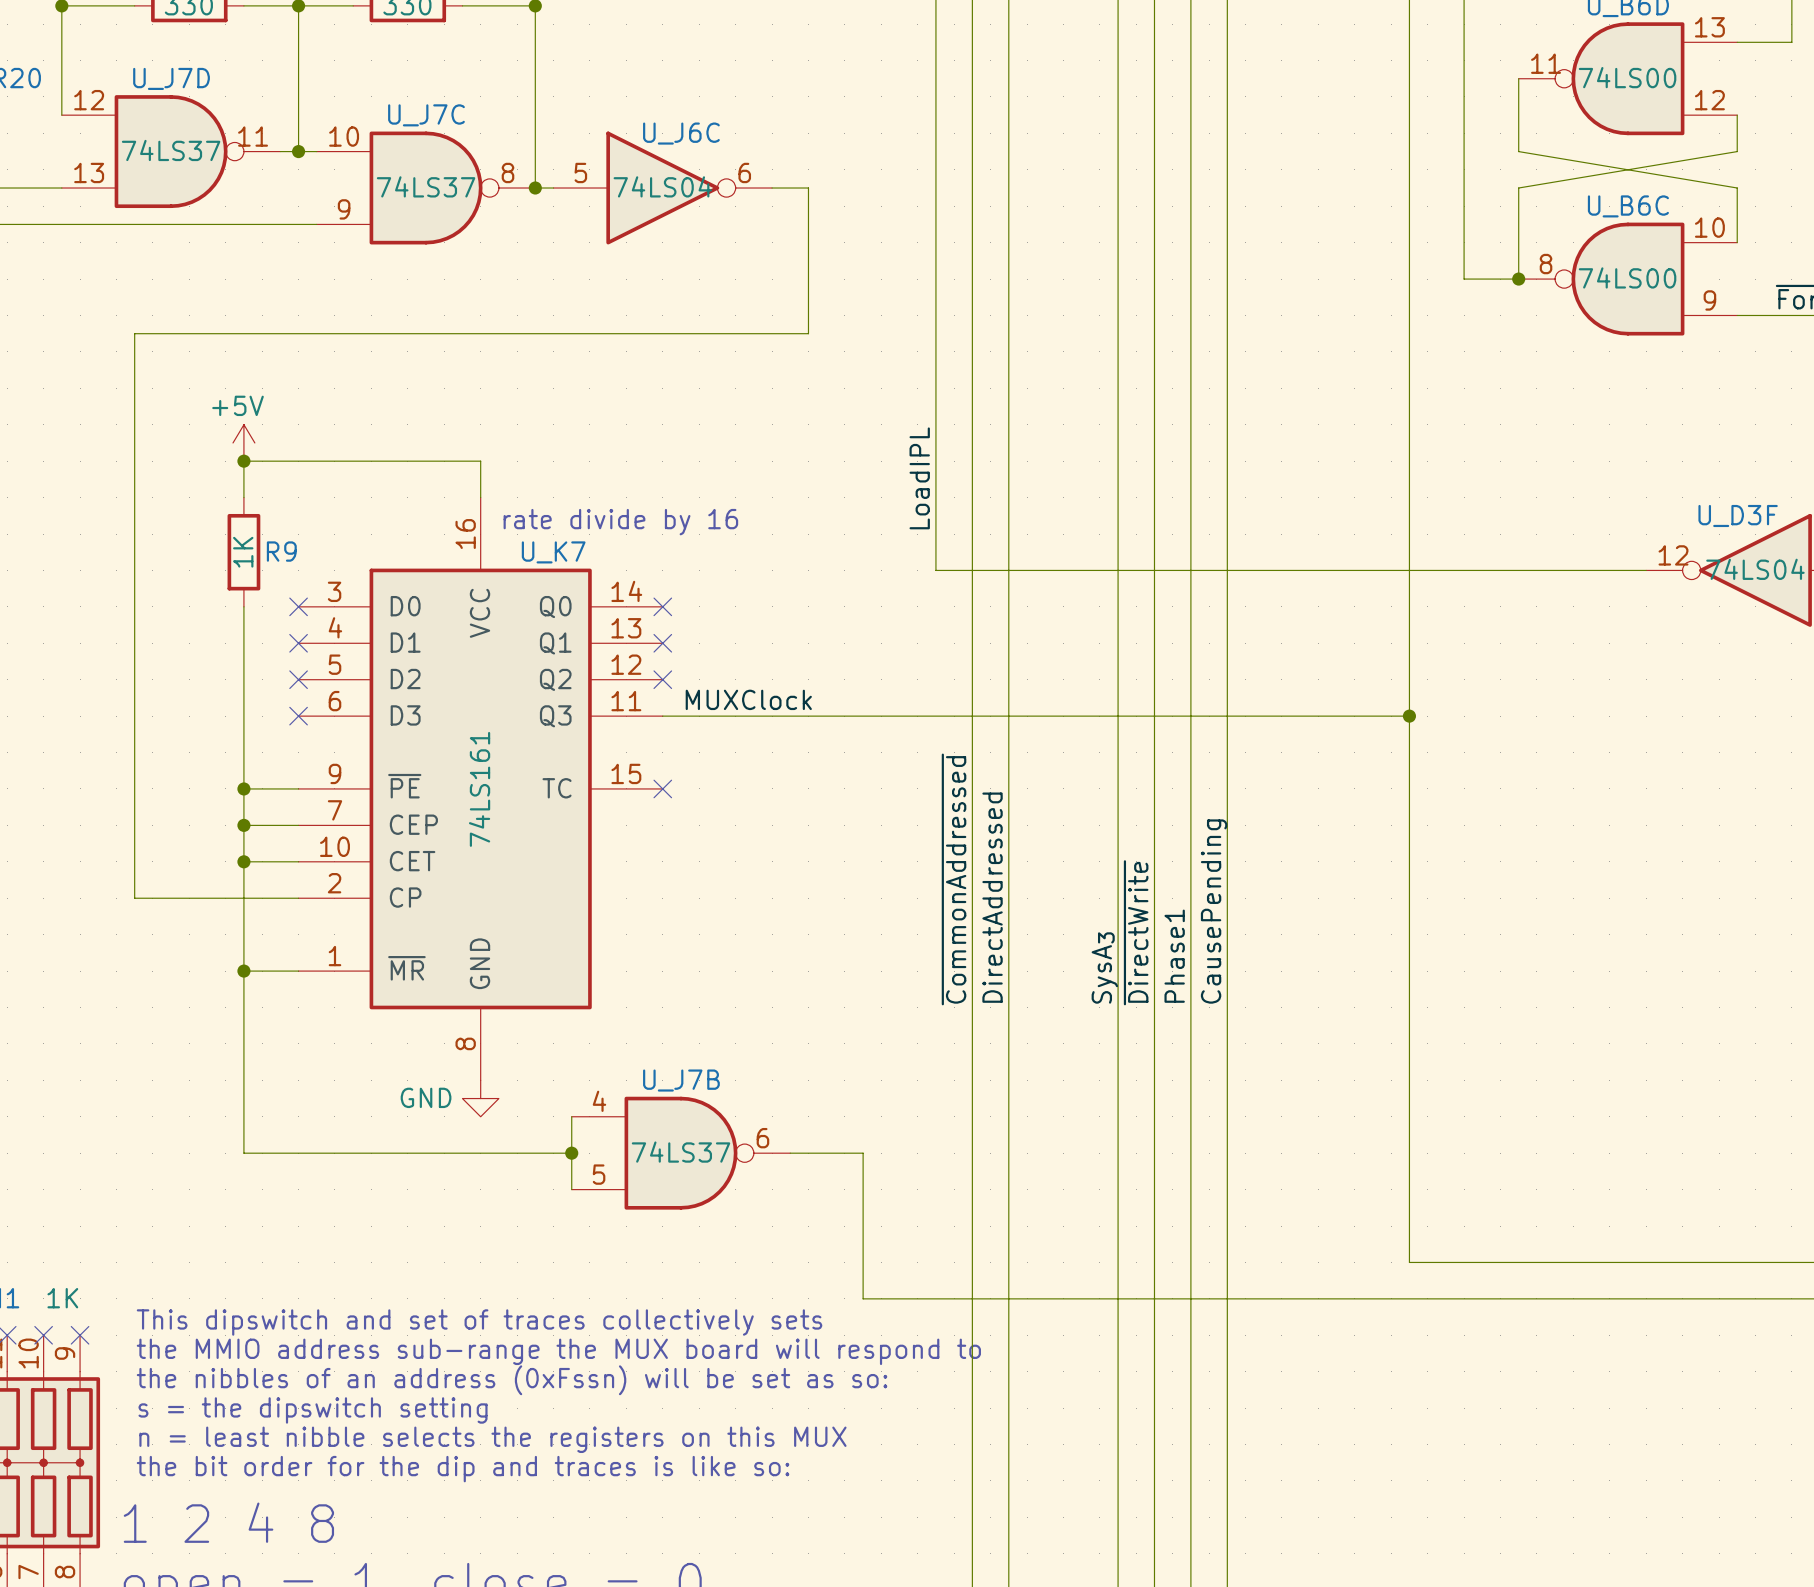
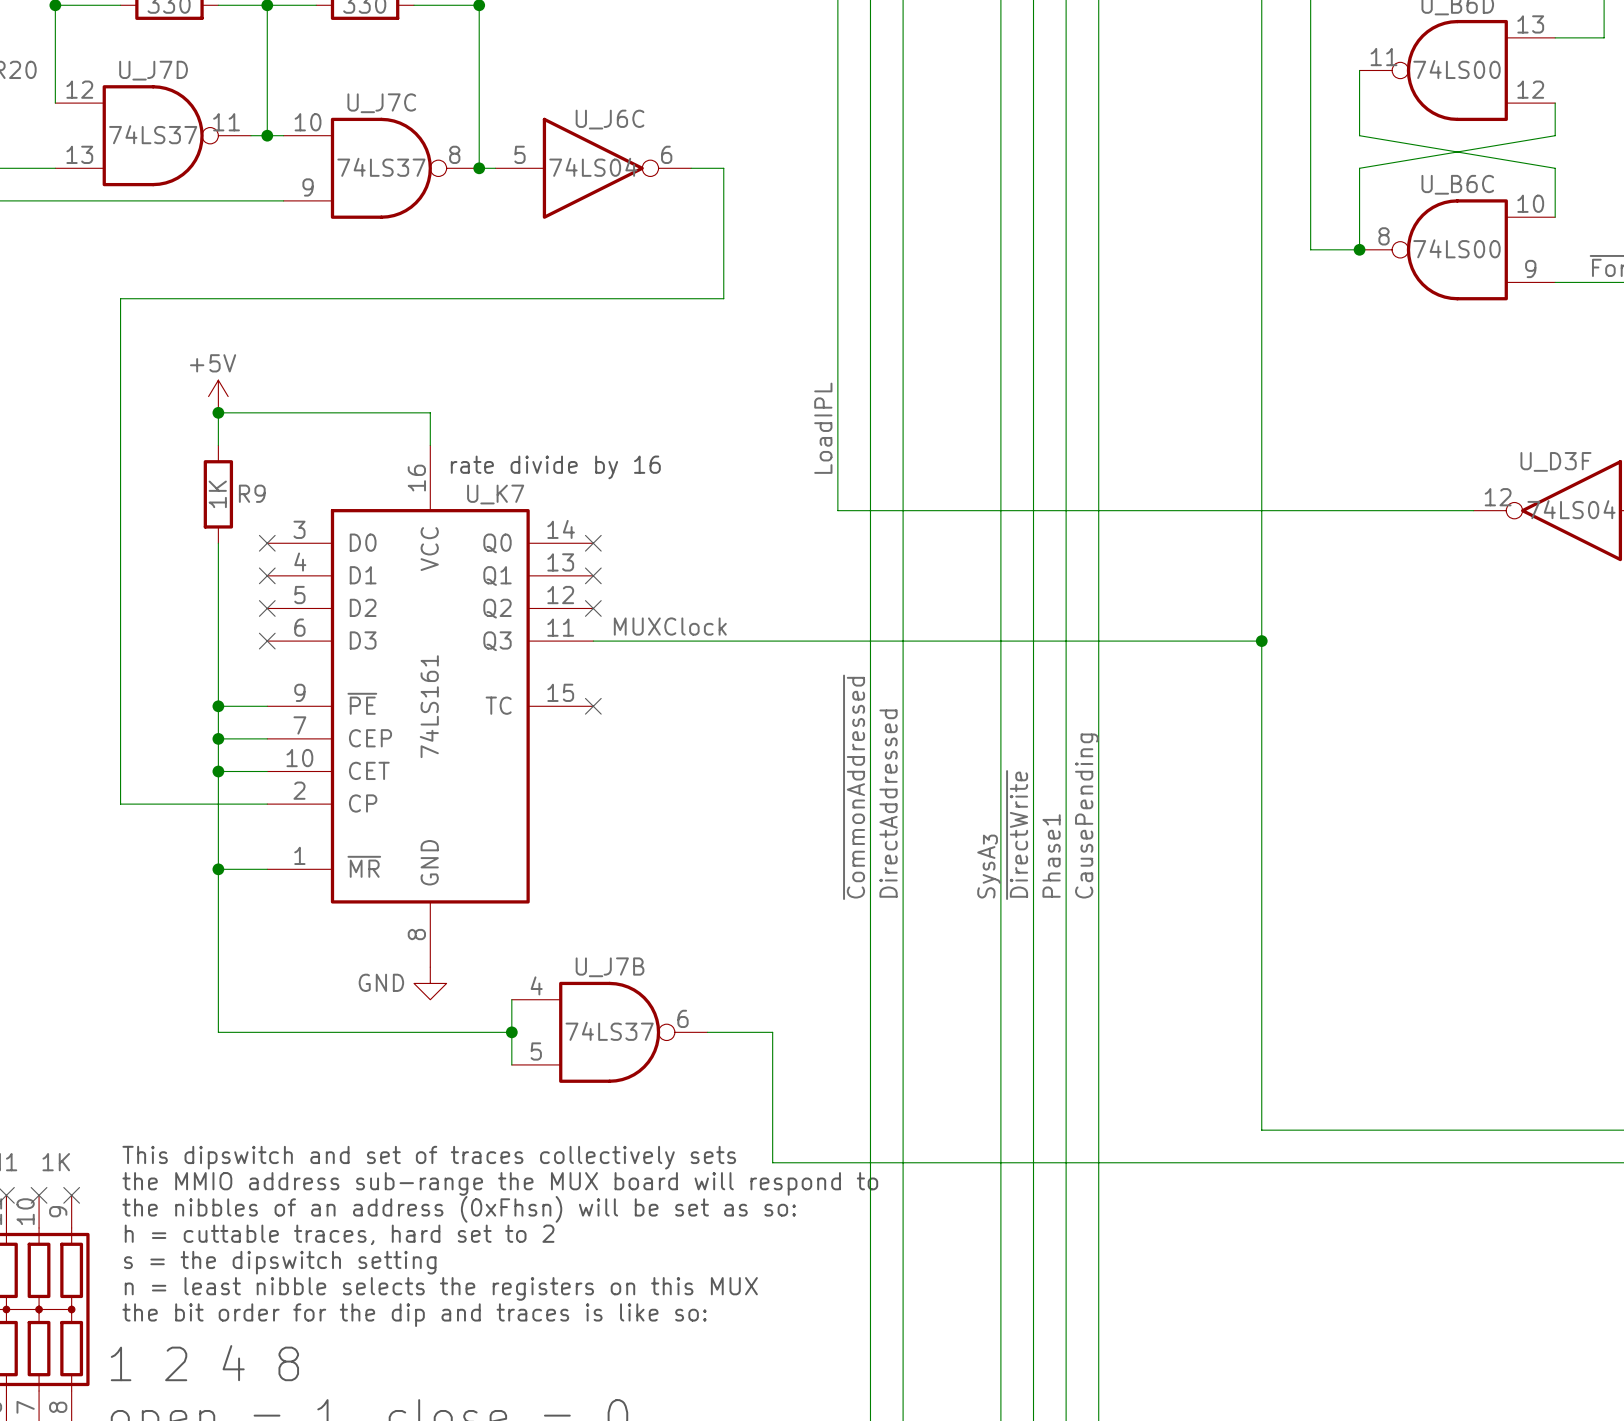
text: none -> This dipswitch and set of traces collectively sets (429, 1157)
text: This dipswitch and set of traces collectively sets (479, 1322) -> the MMIO address sub-range the MUX board will respond to (500, 1183)
text: the MMIO address sub-range the MUX board will respond to (558, 1351) -> the nibbles of an address (0xFhsn) will be set as so: (459, 1209)
text: the nibbles of an address (0xFssn) will be set as so: (512, 1380) -> h = cuttable traces, hard set to 2 (339, 1234)

